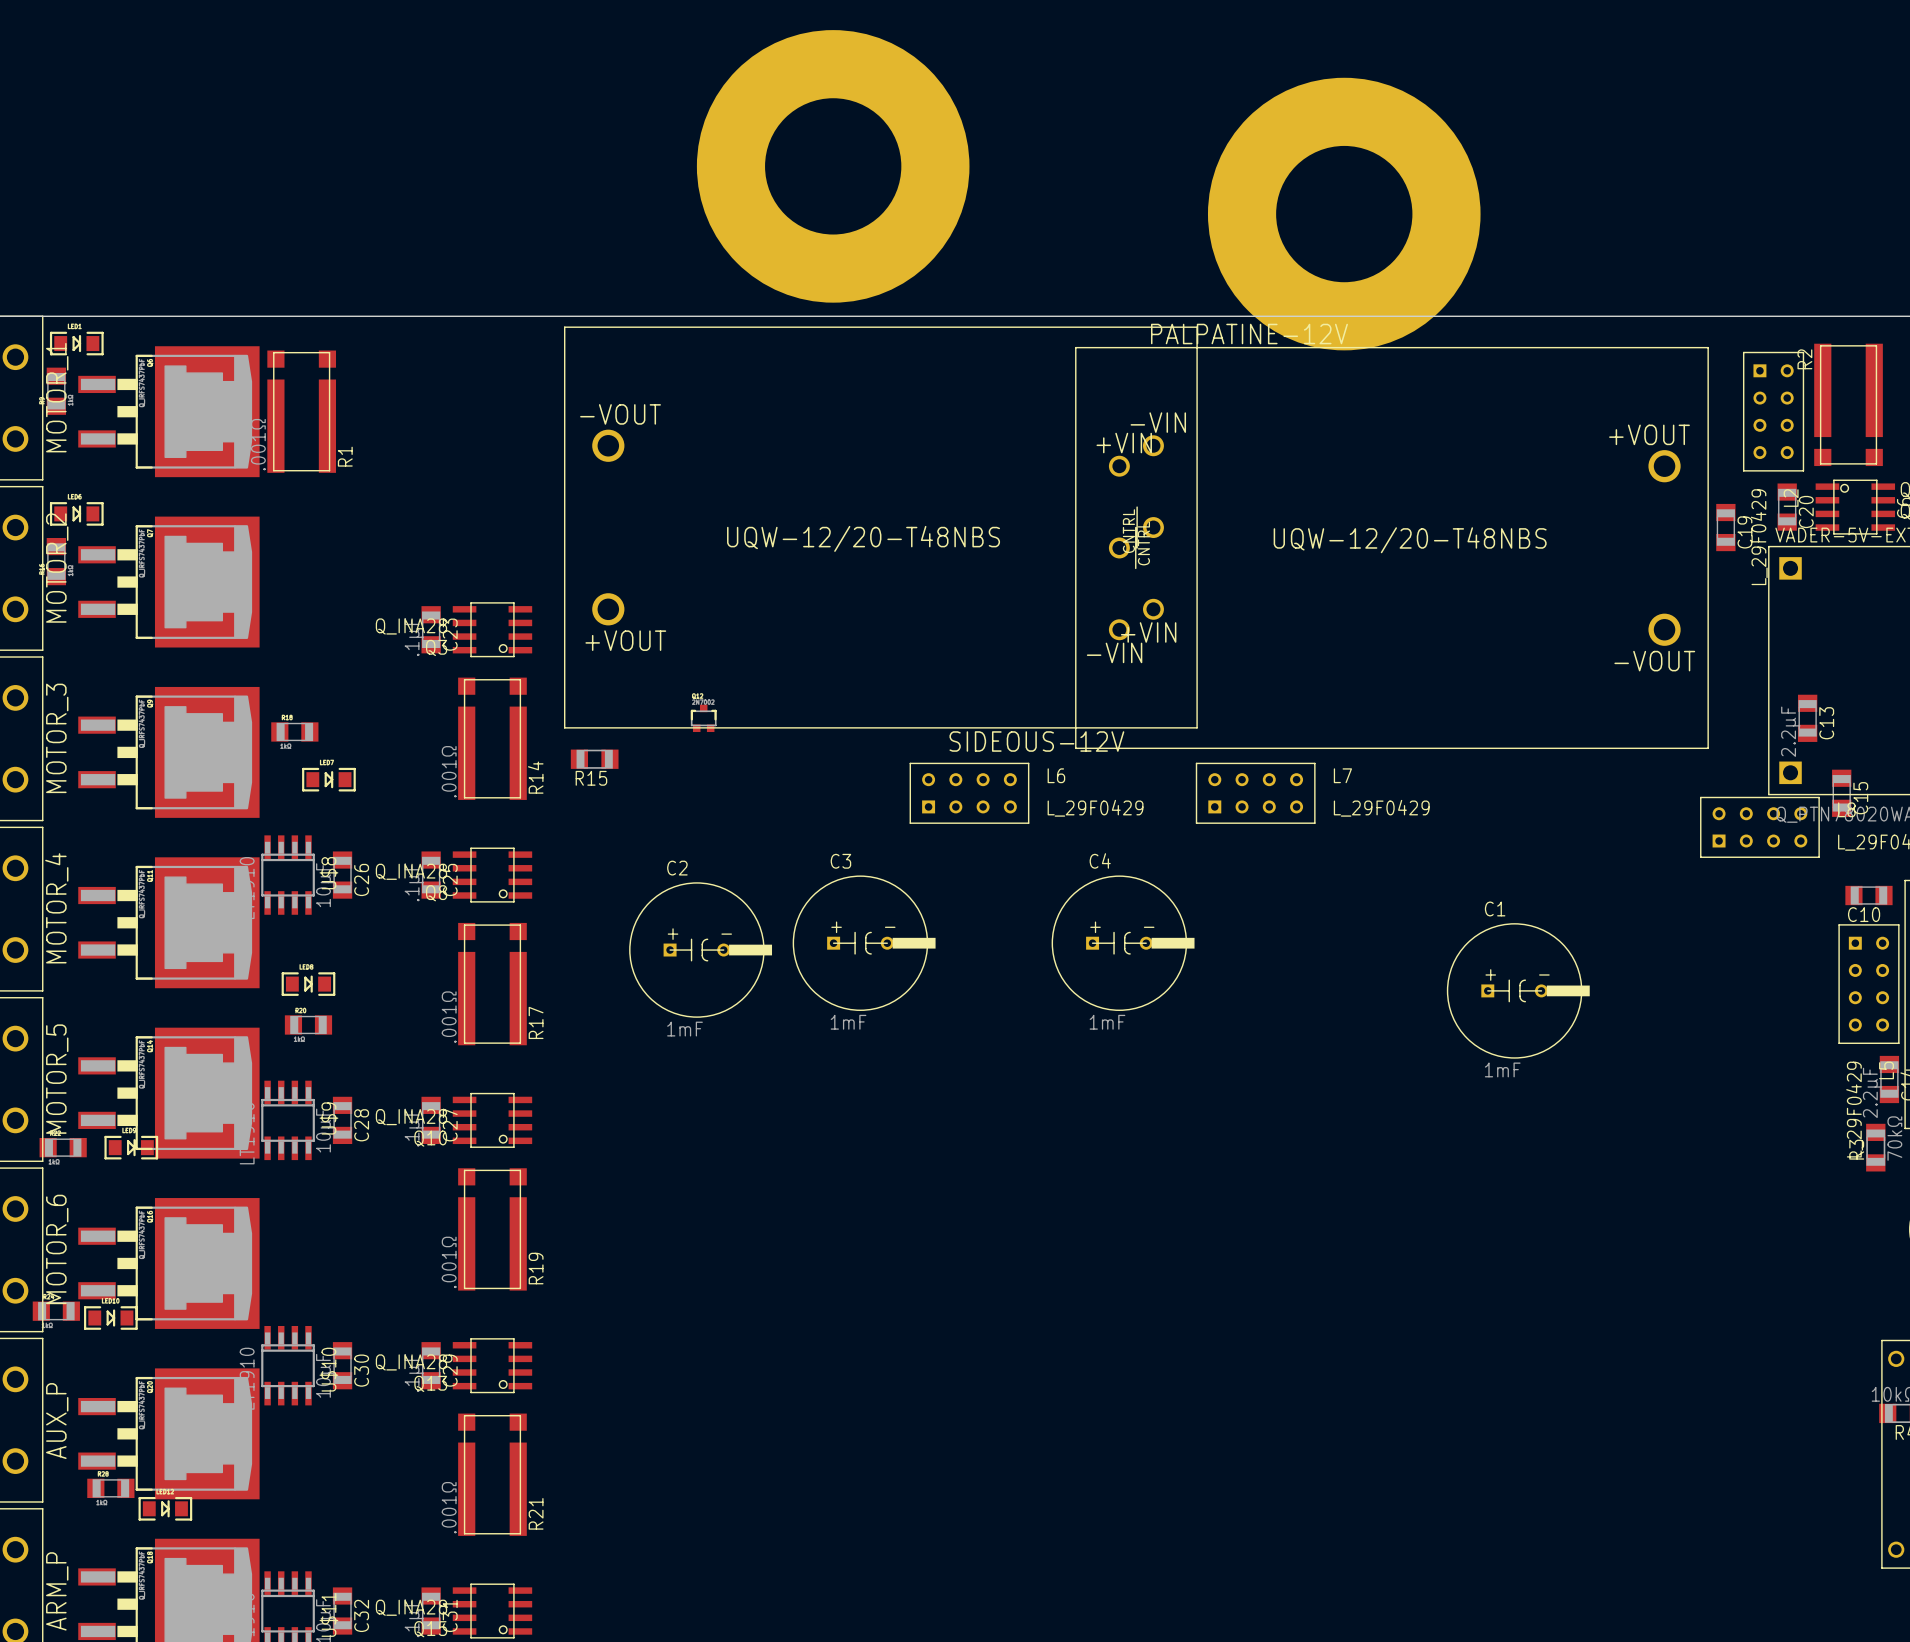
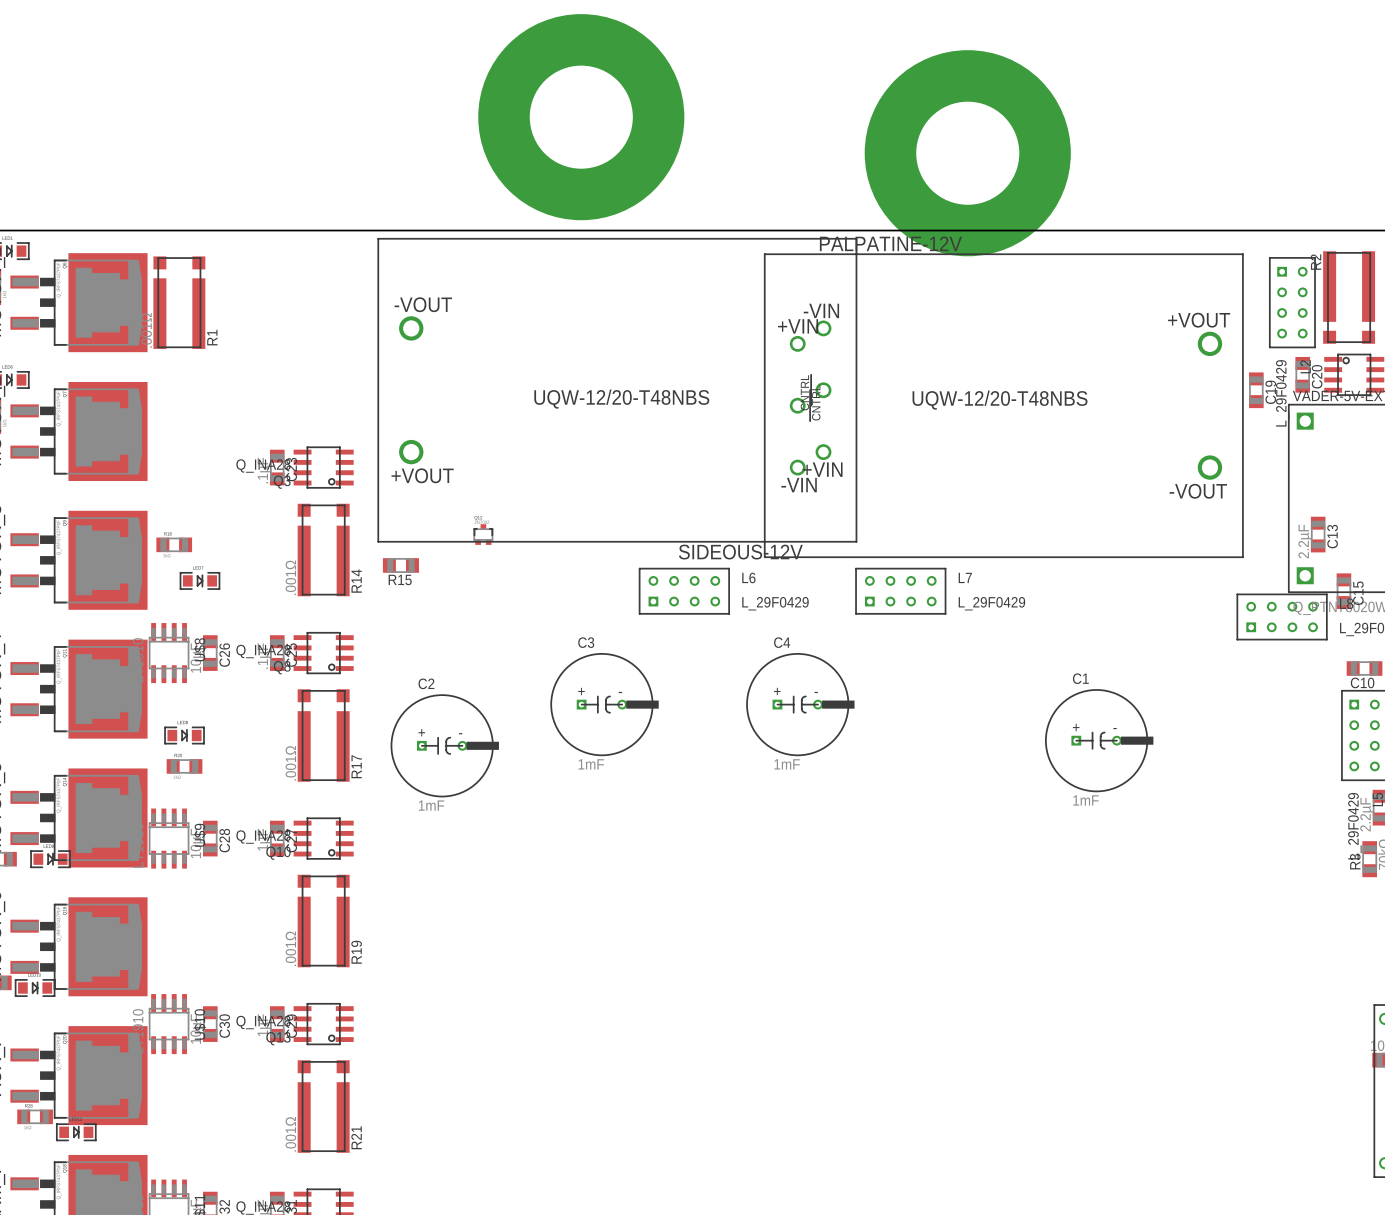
C2 position: (700, 950) -> (444, 745)

